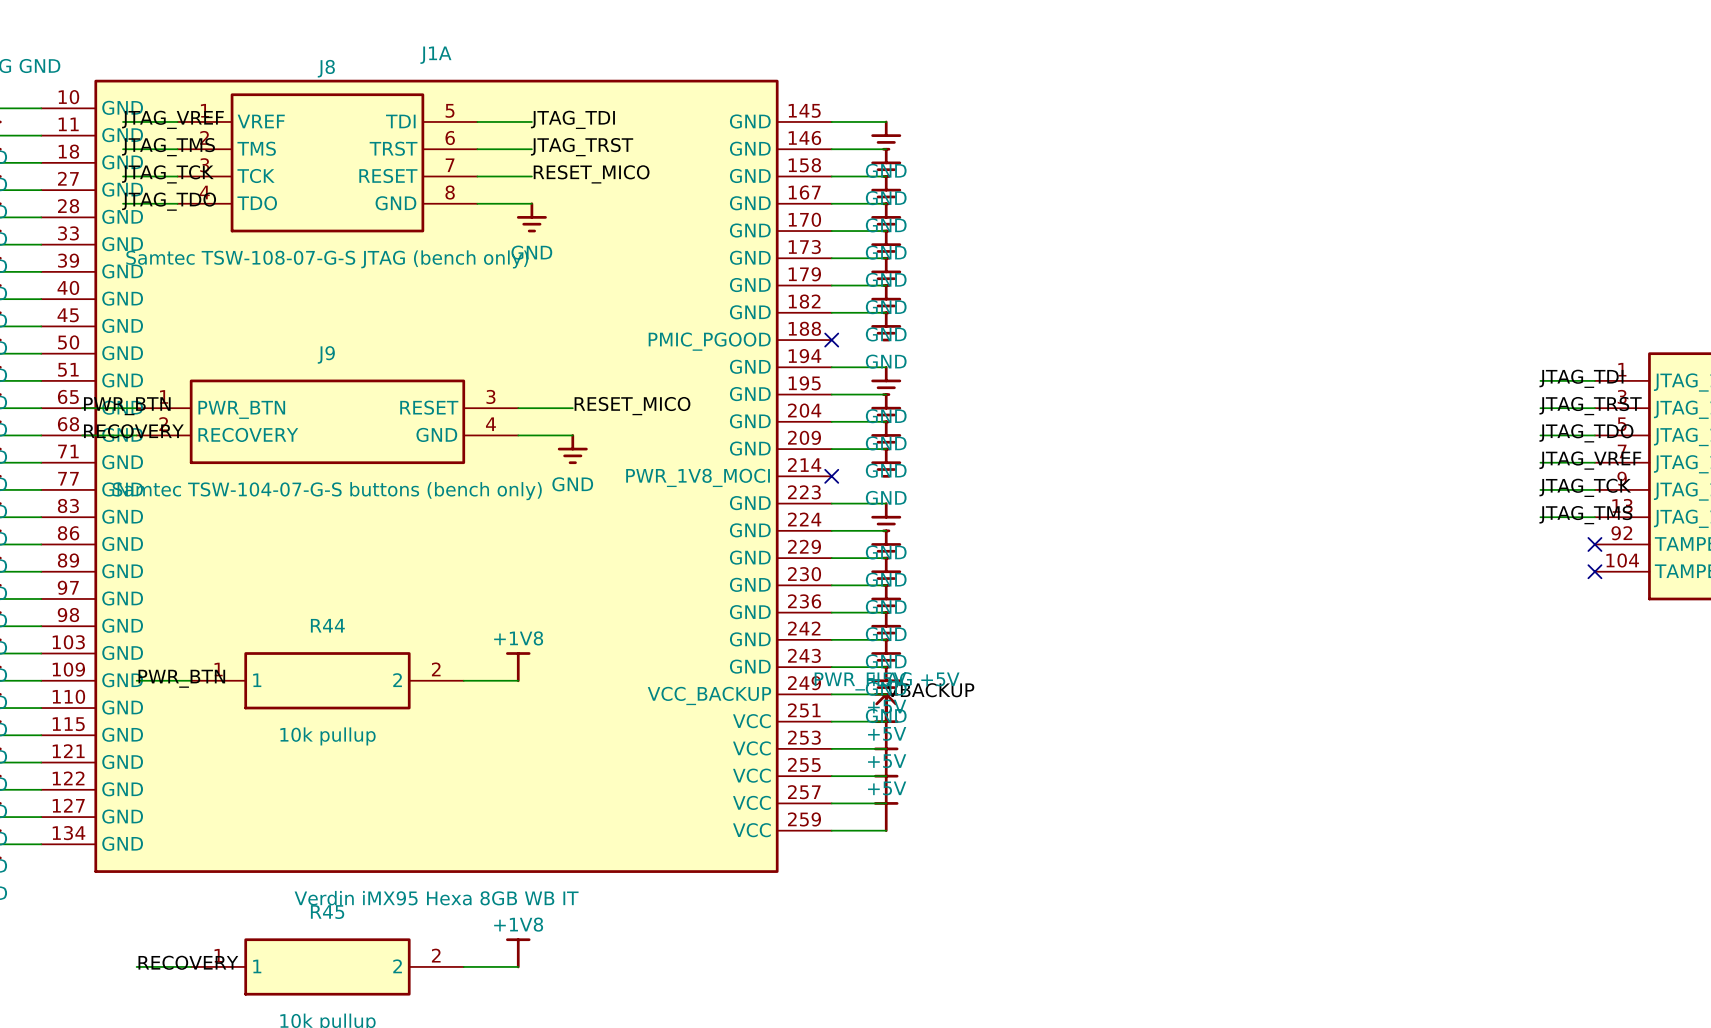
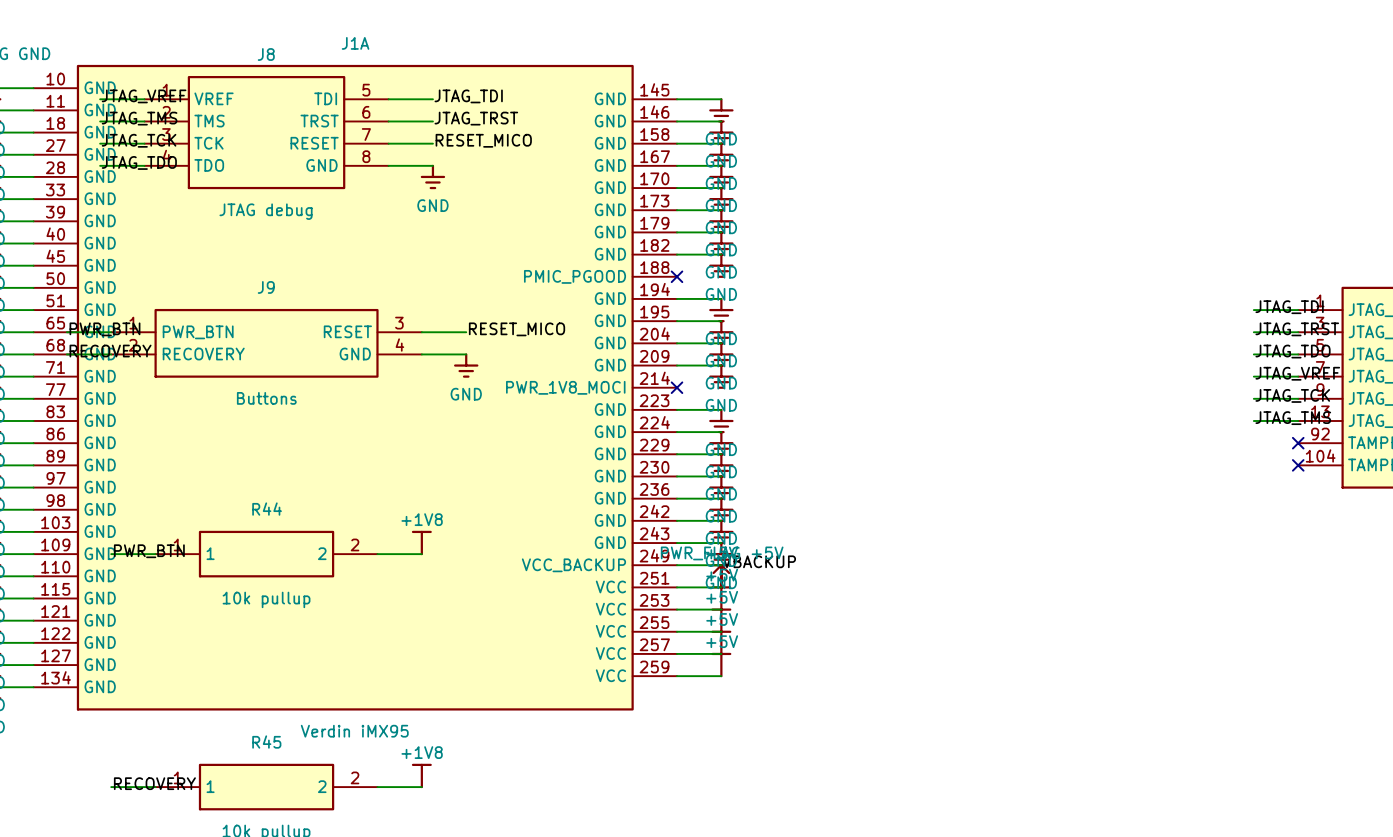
J8 value: Samtec TSW-108-07-G-S JTAG (bench only) (327, 259) -> JTAG debug (266, 211)
J9 value: Samtec TSW-104-07-G-S buttons (bench only) (327, 491) -> Buttons (266, 398)
J1A value: Verdin iMX95 Hexa 8GB WB IT (436, 898) -> Verdin iMX95 (354, 731)

